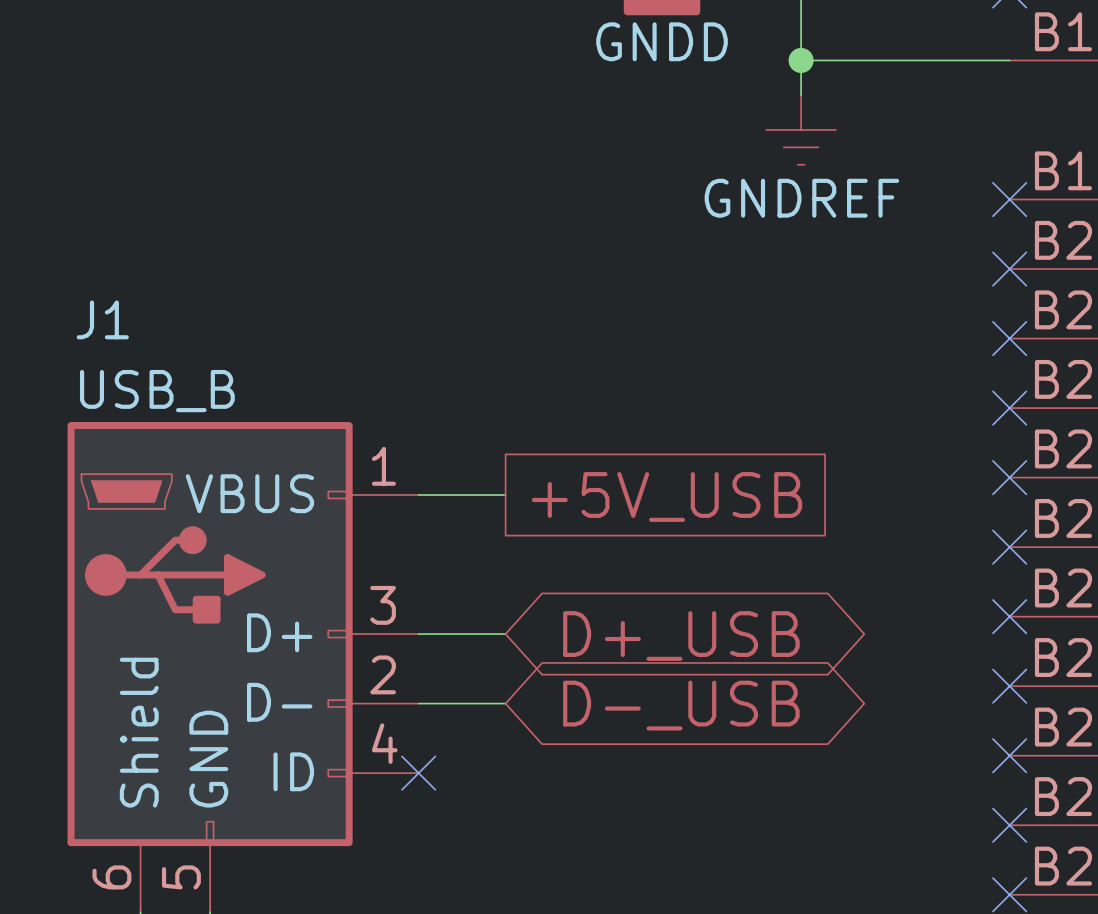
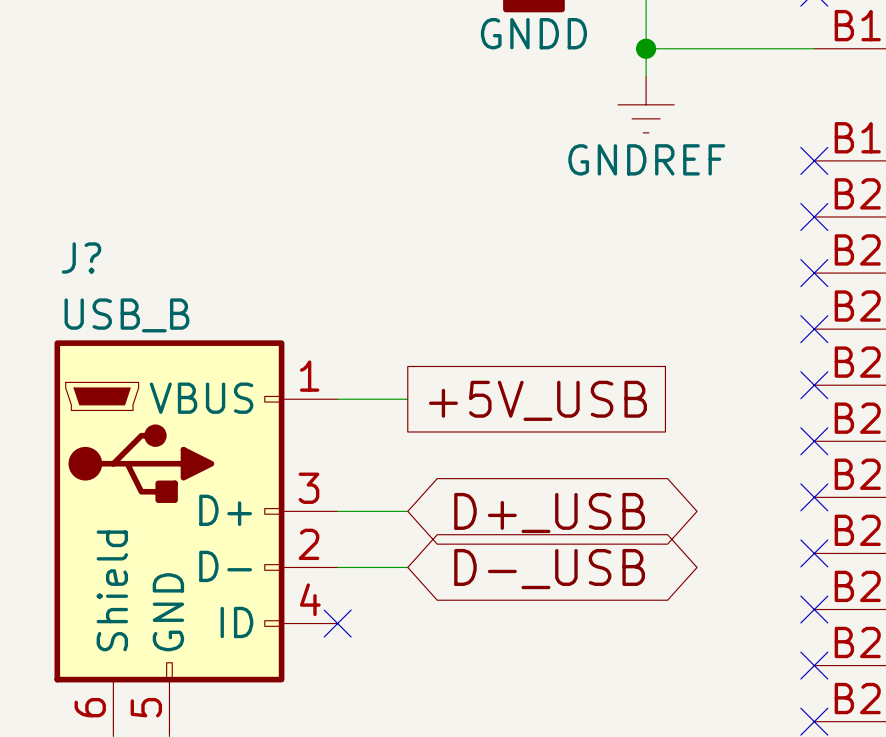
J1 name: J1 (102, 319) -> J? (81, 258)

